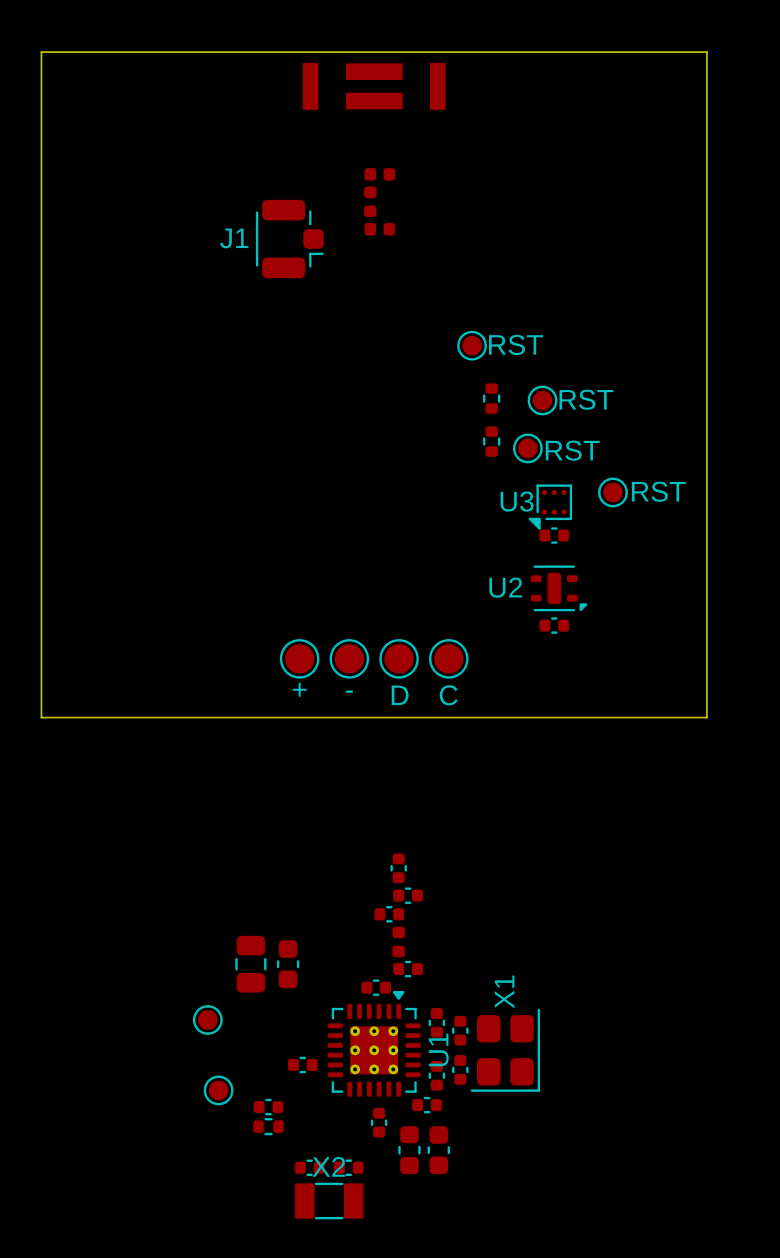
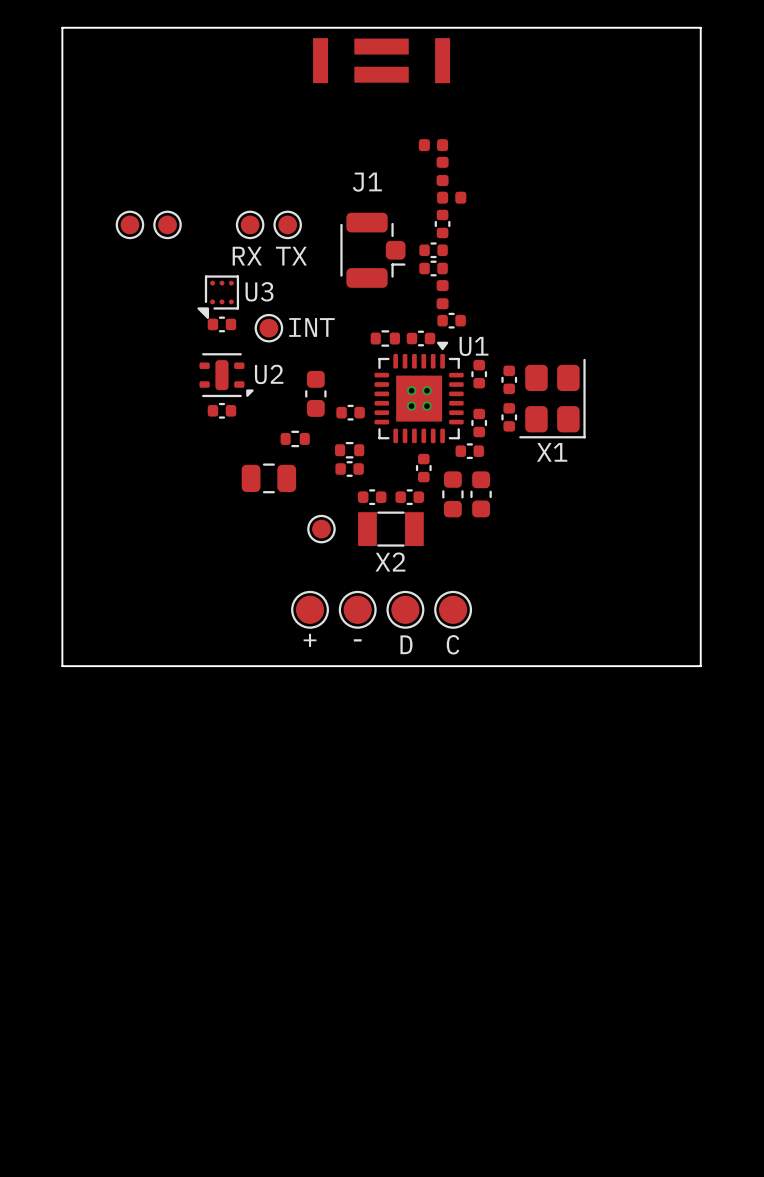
part: (379, 174) -> none
part: none -> (433, 145)
part: (370, 201) -> none
part: none -> (442, 171)
part: (379, 229) -> none
part: none -> (451, 197)
J1 name position: J1 (234, 238) -> J1 (367, 182)
J1 position: (289, 239) -> (372, 250)
part: none -> (442, 223)
part: none -> (129, 224)
part: none -> (167, 224)
part: none -> (250, 224)
part: none -> (287, 224)
part: none -> (433, 250)
text: none -> RX (247, 256)
text: none -> TX (291, 256)
part: none -> (433, 268)
part: none -> (442, 294)
text: RST (515, 344) -> none
part: (472, 345) -> none
part: none -> (451, 320)
part: none -> (221, 324)
text: none -> INT (311, 327)
part: none -> (268, 328)
part: none -> (385, 338)
part: none -> (420, 338)
part: (491, 398) -> none
text: RST (586, 399) -> none
part: (542, 400) -> none
part: none -> (479, 374)
part: none -> (509, 379)
part: none -> (315, 393)
part: (491, 441) -> none
part: (527, 448) -> none
text: RST (572, 450) -> none
part: none -> (221, 410)
part: none -> (350, 412)
part: none -> (509, 417)
part: none -> (479, 423)
part: none -> (295, 438)
text: RST (658, 491) -> none
part: none -> (349, 450)
part: (613, 492) -> none
part: none -> (469, 451)
U3 name position: U3 (517, 501) -> U3 (259, 291)
U3 position: (550, 507) -> (218, 297)
part: none -> (423, 468)
part: none -> (349, 469)
part: (554, 535) -> none
part: none -> (452, 494)
part: none -> (481, 494)
part: none -> (372, 497)
part: none -> (409, 497)
part: none -> (321, 529)
U2 name position: U2 (505, 587) -> U2 (269, 374)
U2 position: (559, 588) -> (226, 375)
part: (554, 625) -> none
part: (398, 868) -> none
part: (408, 895) -> none
part: (389, 914) -> none
part: (398, 941) -> none
part rotation: 0° (250, 964) -> 90° clockwise (268, 478)
part position: (250, 964) -> (268, 478)
part: (288, 964) -> none
part: (408, 969) -> none
part: (376, 987) -> none
U1 footprint: [327, 991, 421, 1097] -> [374, 341, 464, 444]
X1 name rotation: 0° (504, 991) -> 90° clockwise (552, 452)
X1 name position: X1 (504, 991) -> X1 (552, 452)
part: (207, 1019) -> none
part: (436, 1022) -> none
part: (460, 1030) -> none
U1 name position: U1 (438, 1049) -> U1 (474, 346)
X1 position: (505, 1050) -> (552, 398)
part: (302, 1064) -> none
part: (460, 1069) -> none
part: (436, 1075) -> none
part: (218, 1090) -> none
part: (427, 1105) -> none
part: (268, 1107) -> none
part: (379, 1122) -> none
part: (268, 1126) -> none
part: (409, 1150) -> none
part: (438, 1150) -> none
X2 name position: X2 (328, 1166) -> X2 (390, 562)
part: (309, 1167) -> none
part: (348, 1167) -> none
X2 position: (329, 1201) -> (390, 529)

